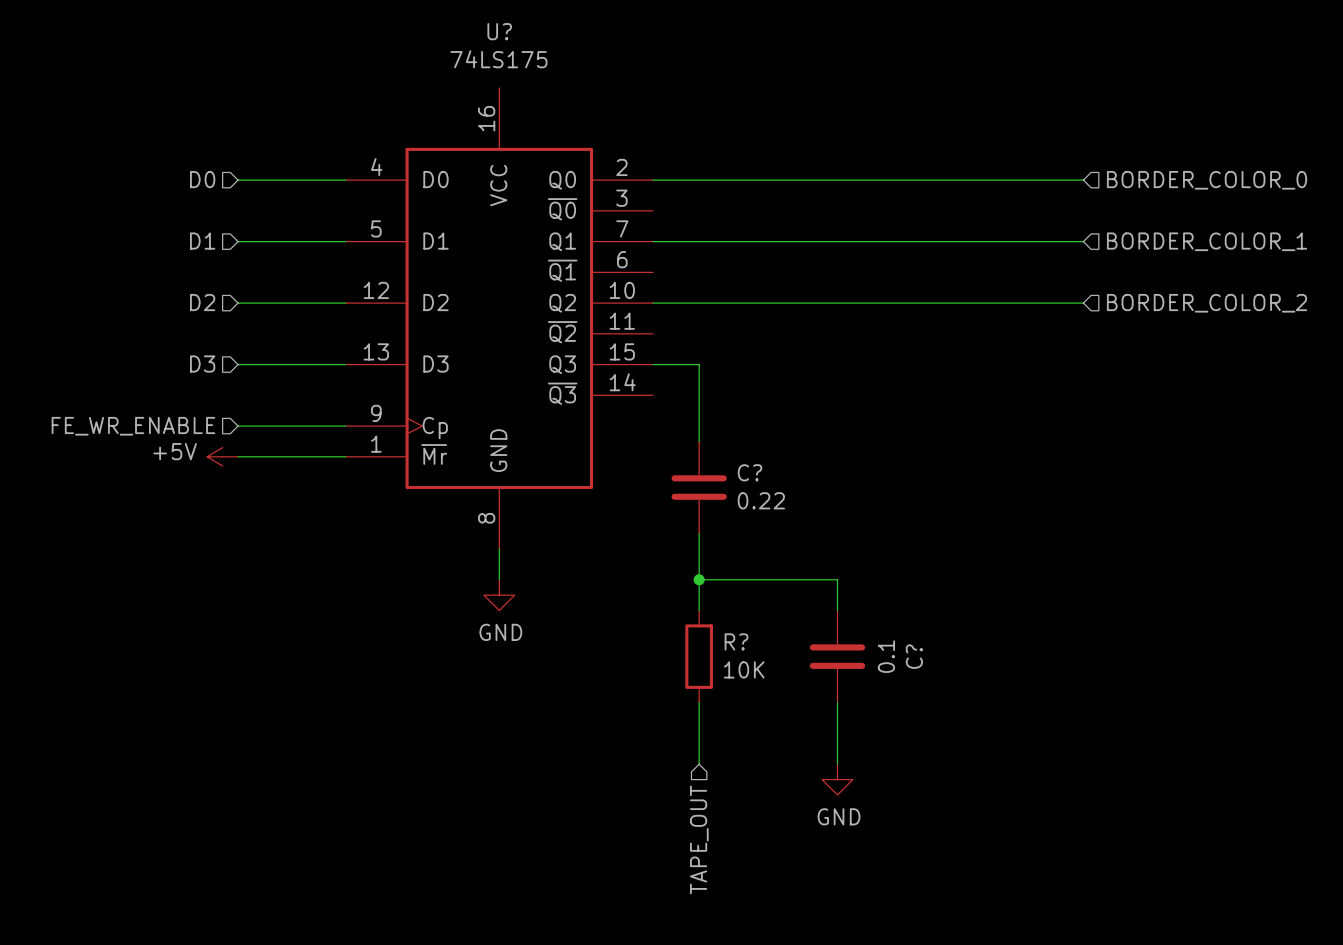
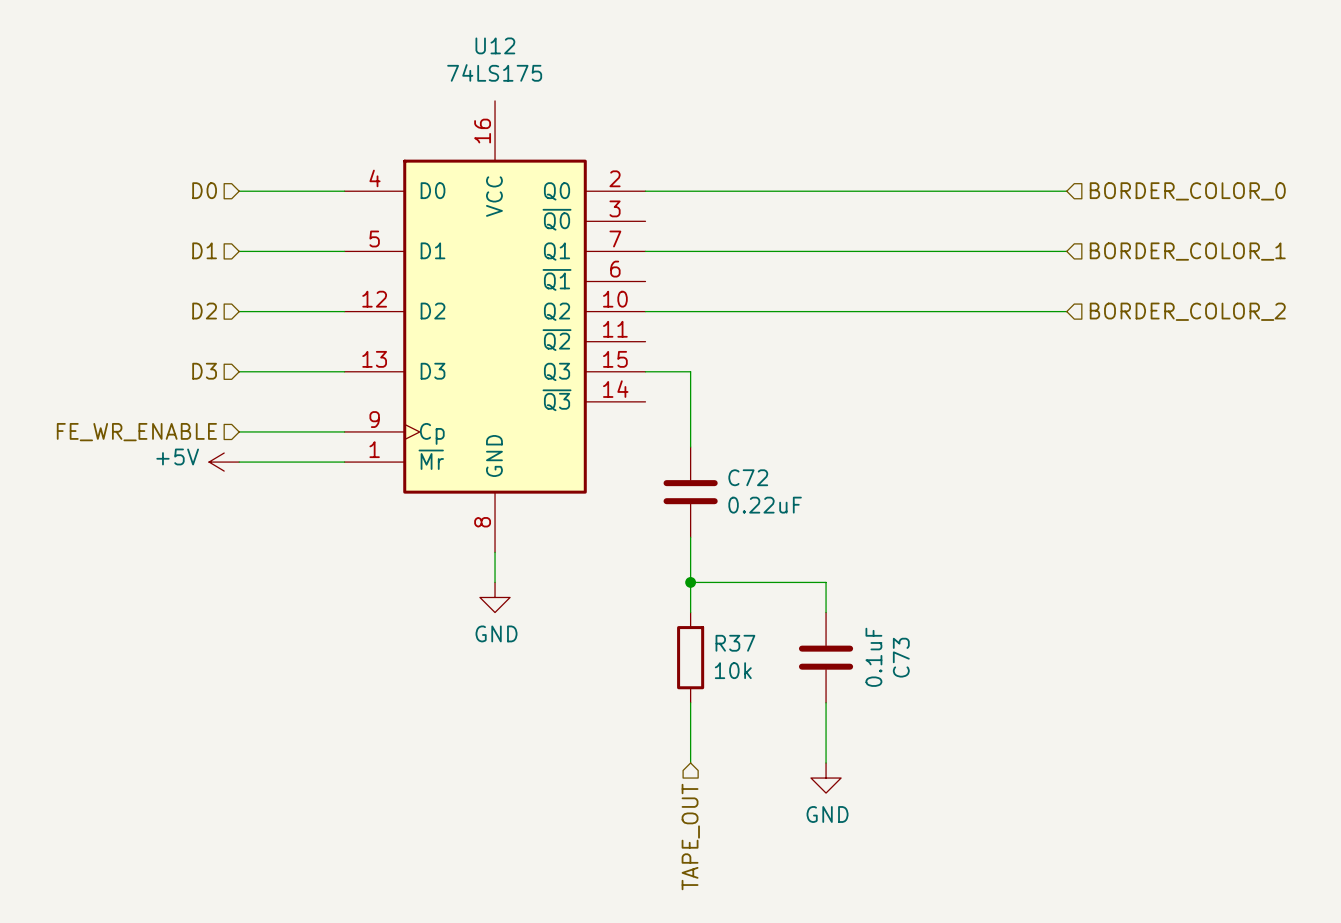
U? name: U? (499, 31) -> U12 (495, 45)
C? name: C? (749, 472) -> C72 (748, 477)
C? value: 0.22 (761, 500) -> 0.22uF (765, 505)
R? name: R? (736, 641) -> R37 (735, 643)
C? value: 0.1 (886, 656) -> 0.1uF (873, 657)
C? name: C? (914, 656) -> C73 (901, 657)
R? value: 10K (744, 669) -> 10k (733, 670)

